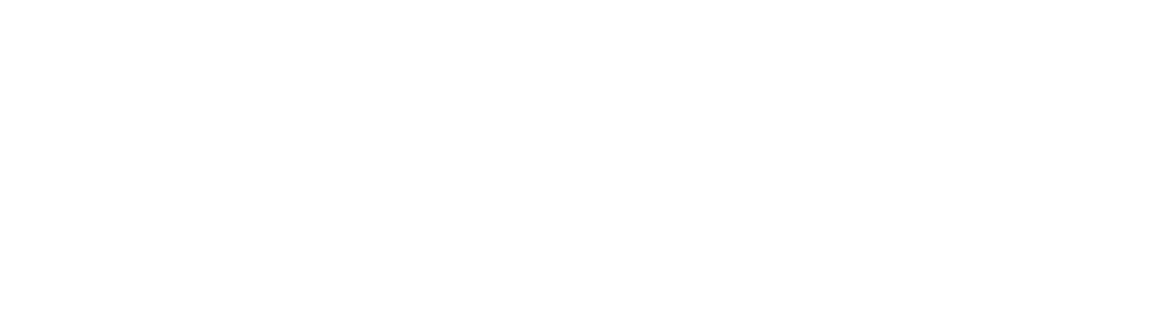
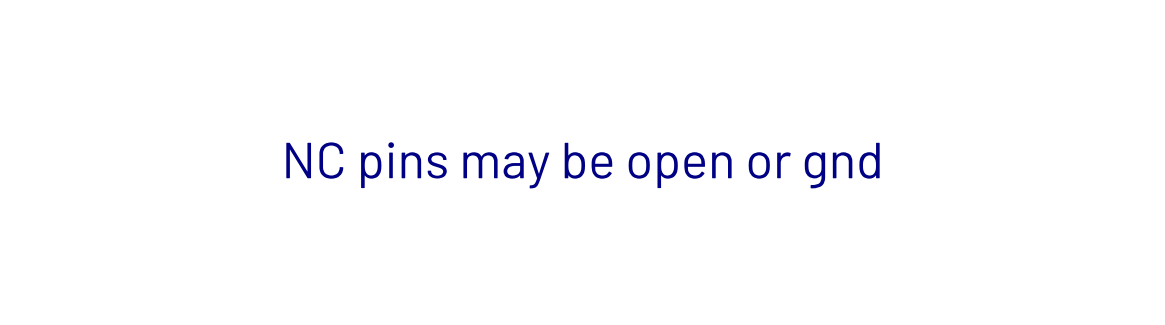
text: none -> NC pins may be open or gnd (582, 165)

